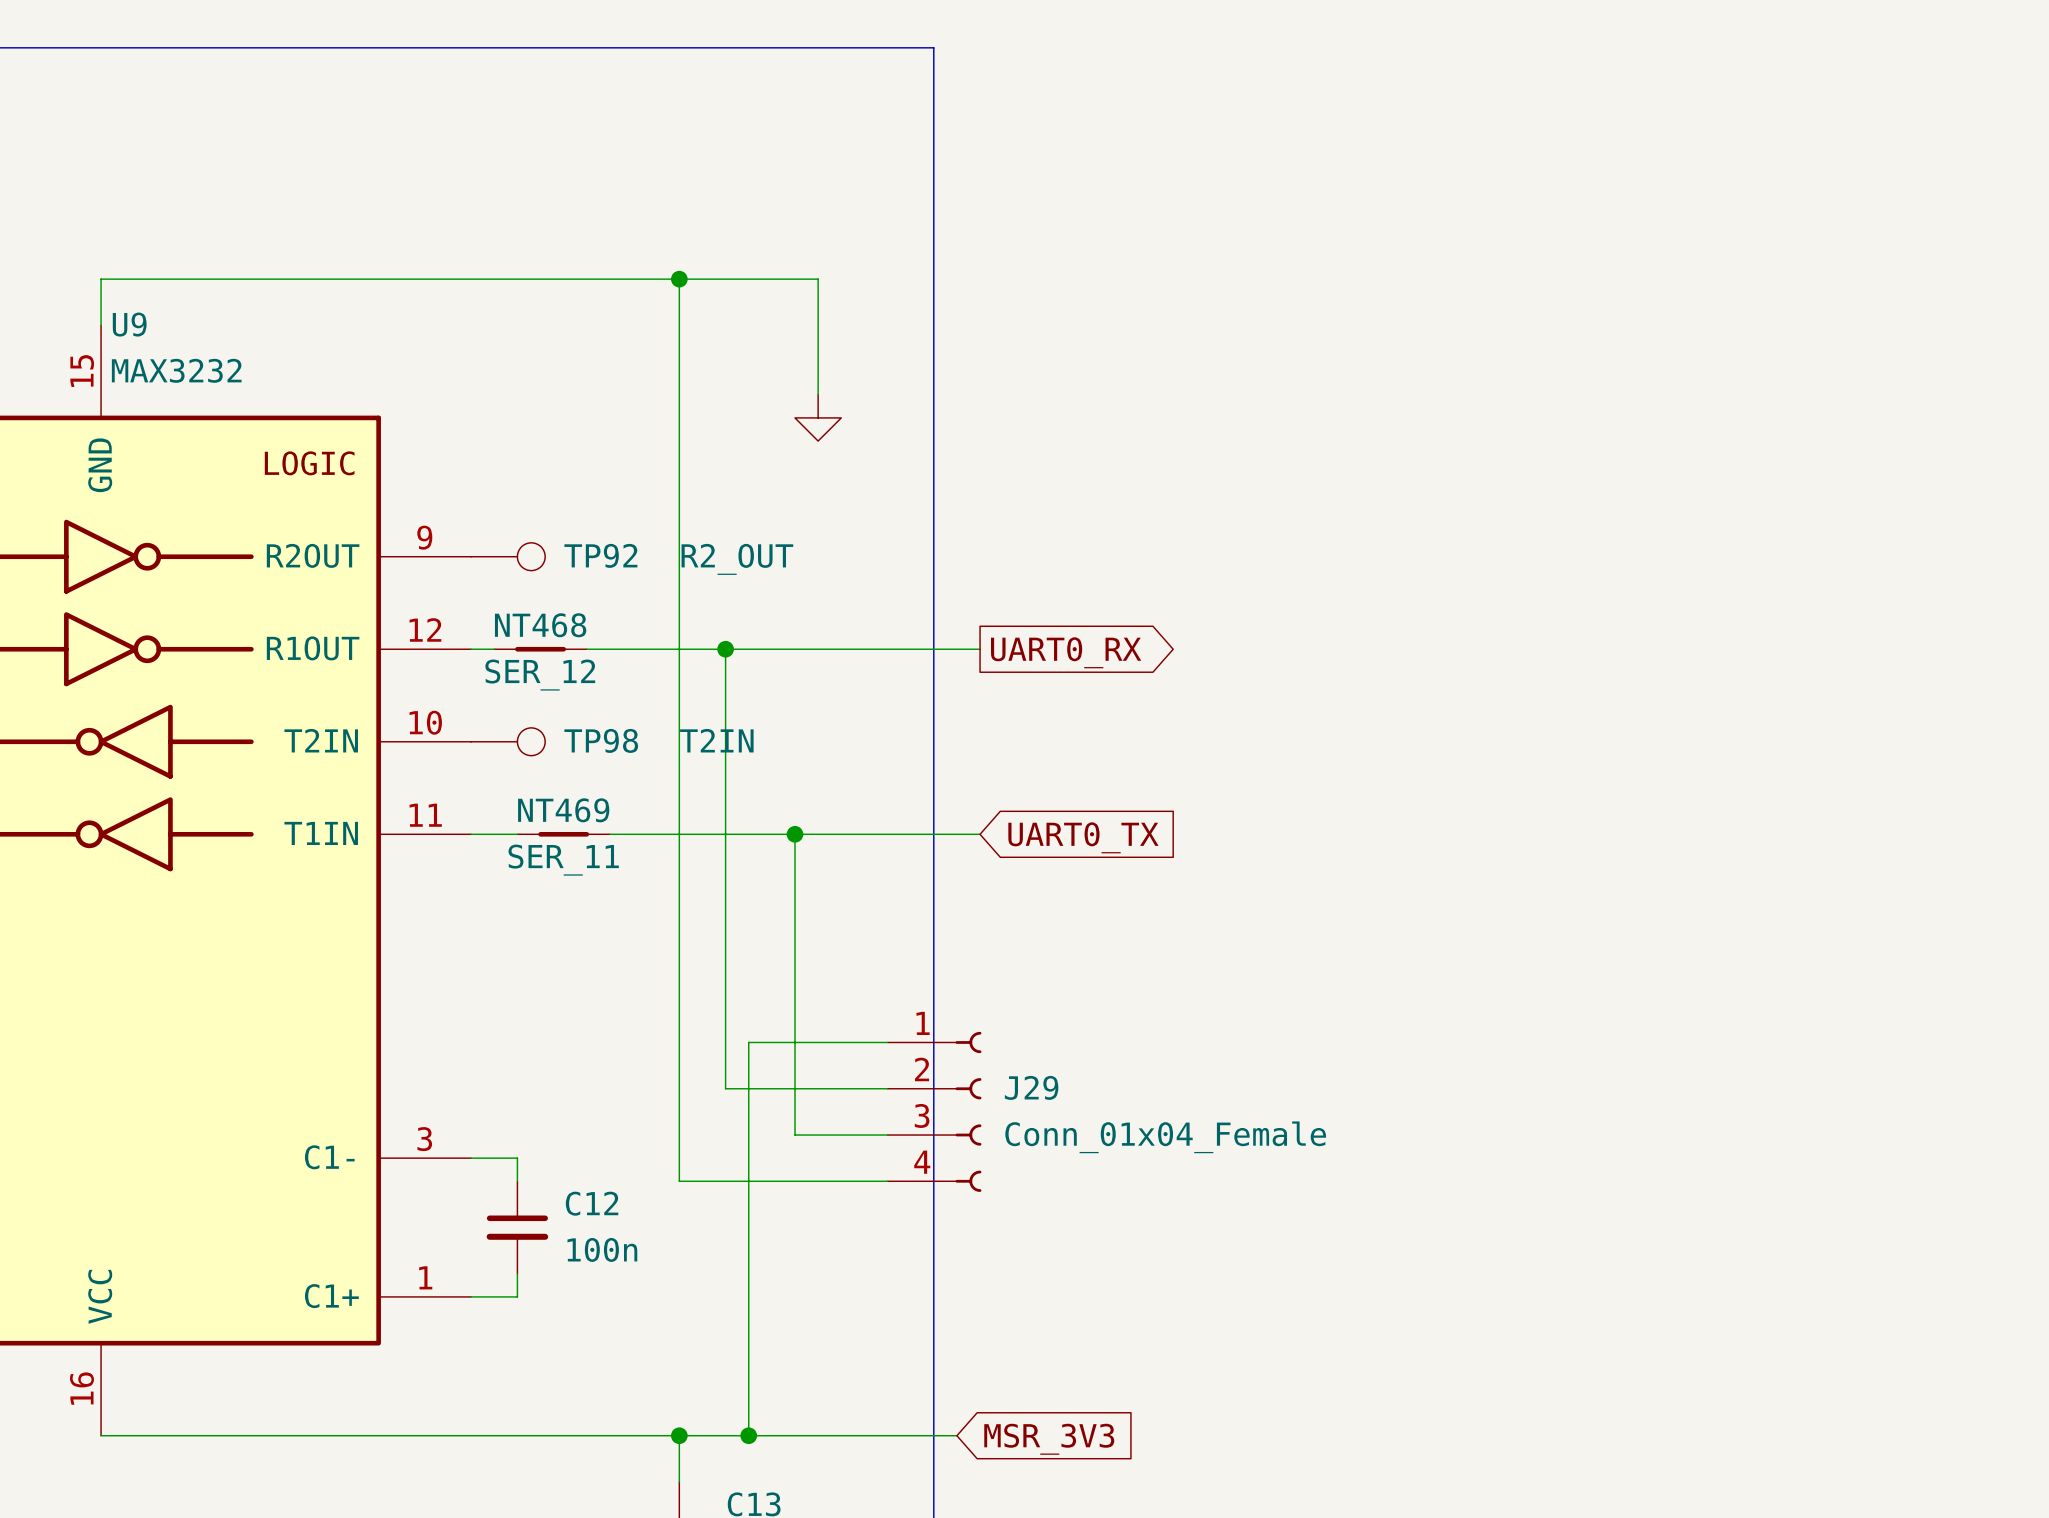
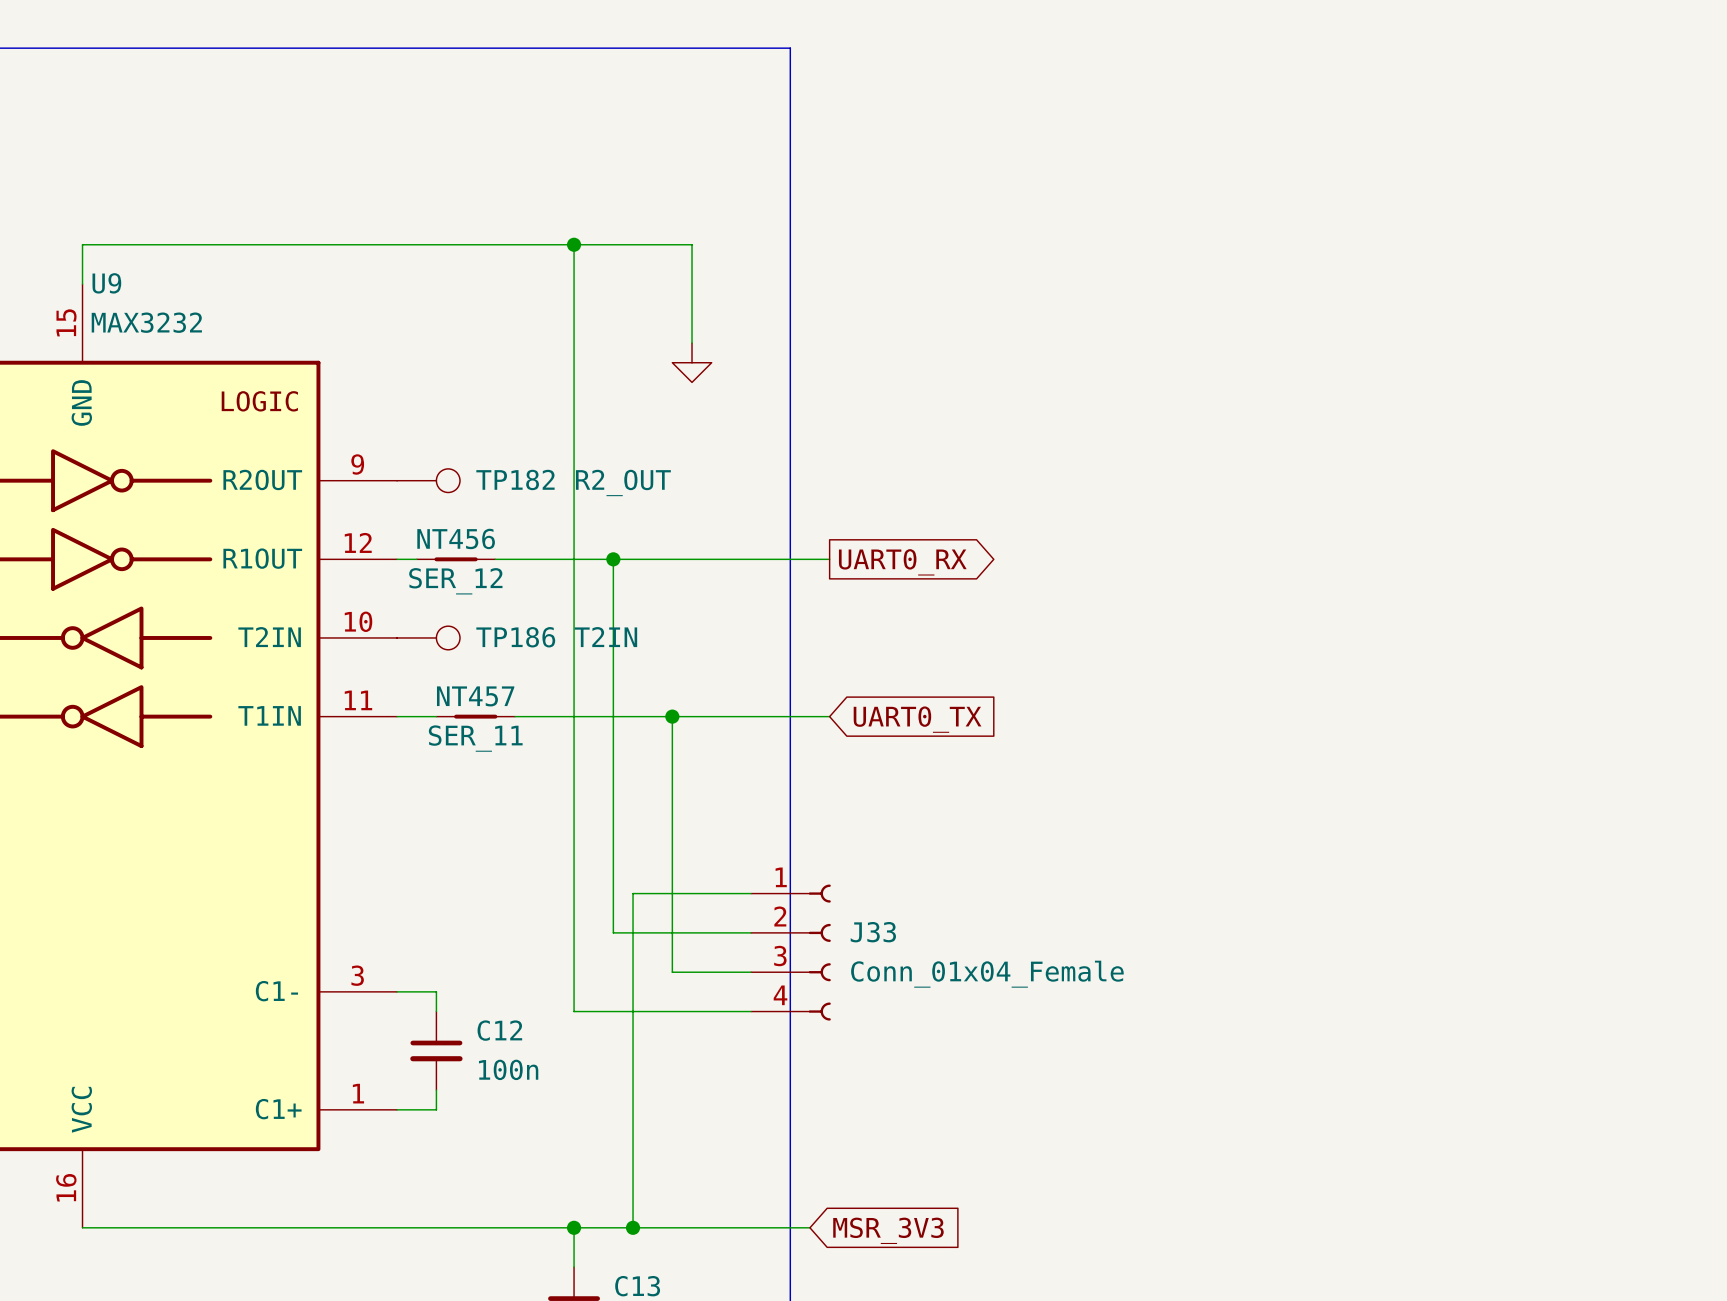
TP92 name: TP92 (600, 555) -> TP182 (515, 479)
NT468 name: NT468 (540, 625) -> NT456 (456, 538)
TP98 name: TP98 (601, 740) -> TP186 (515, 637)
NT469 name: NT469 (563, 810) -> NT457 (475, 696)
J29 name: J29 (1031, 1087) -> J33 (873, 932)

